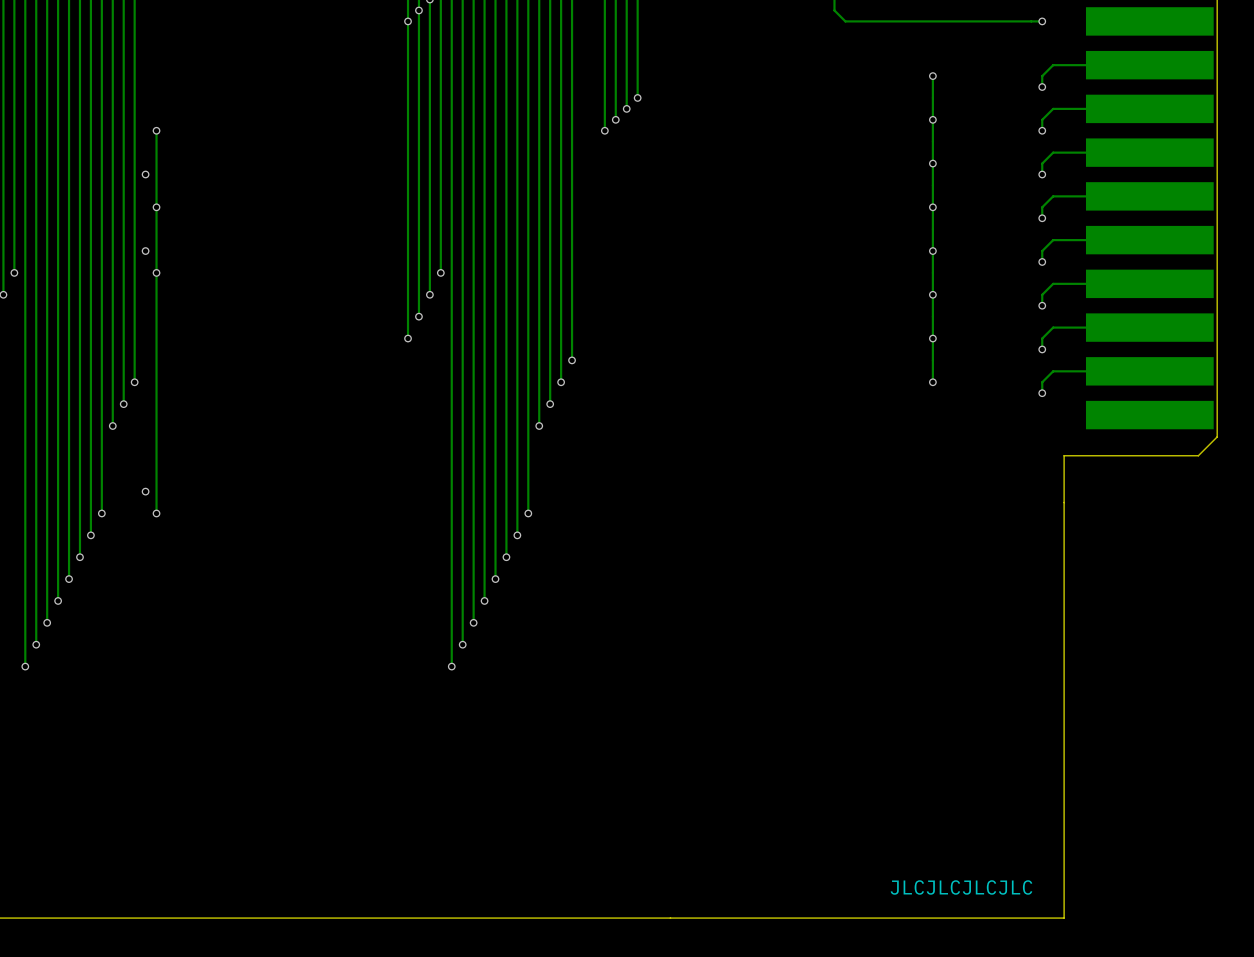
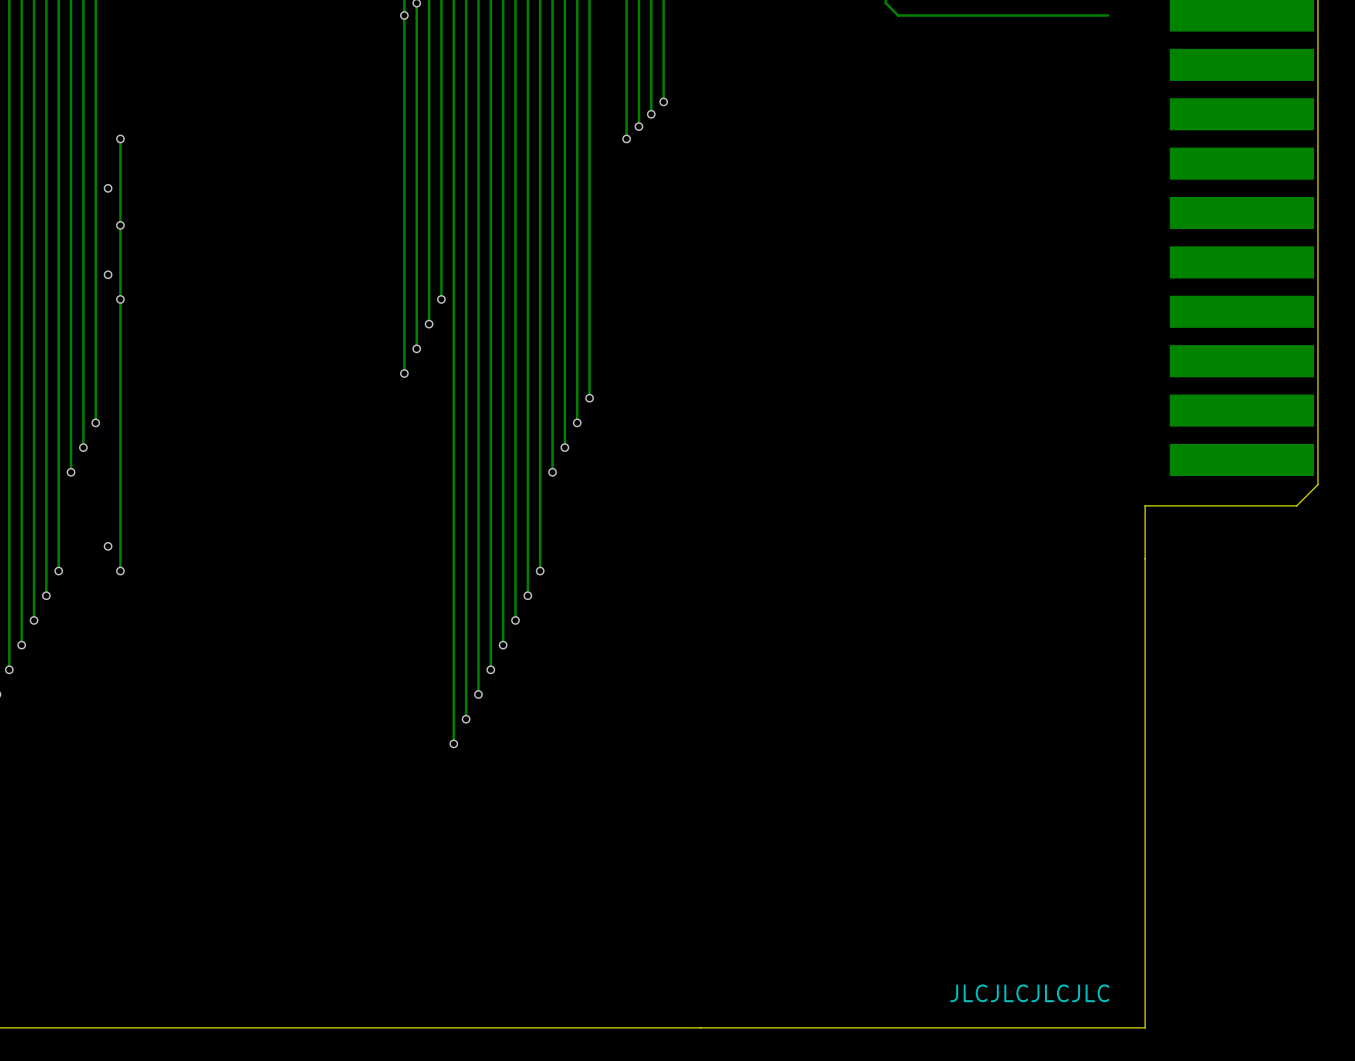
track: (1042, 21) (1031, 21) -> none
via: (1042, 21) -> none
track: (1149, 65) (1053, 65) (1042, 76) (1042, 87) -> none
track: (932, 76) (932, 382) -> none
via: (932, 76) -> none
via: (1042, 87) -> none
track: (1149, 108) (1053, 108) (1042, 119) (1042, 130) -> none
via: (932, 119) -> none
via: (1042, 130) -> none
track: (1149, 152) (1053, 152) (1042, 163) (1042, 174) -> none
via: (932, 163) -> none
via: (1042, 174) -> none
track: (1149, 196) (1053, 196) (1042, 207) (1042, 218) -> none
via: (932, 207) -> none
via: (1042, 218) -> none
track: (1149, 240) (1053, 240) (1042, 251) (1042, 261) -> none
via: (932, 251) -> none
via: (1042, 261) -> none
track: (1149, 283) (1053, 283) (1042, 294) (1042, 305) -> none
via: (932, 294) -> none
via: (1042, 305) -> none
track: (1149, 327) (1053, 327) (1042, 338) (1042, 349) -> none
via: (932, 338) -> none
via: (1042, 349) -> none
track: (1149, 371) (1053, 371) (1042, 382) (1042, 393) -> none
via: (932, 382) -> none
via: (1042, 393) -> none

